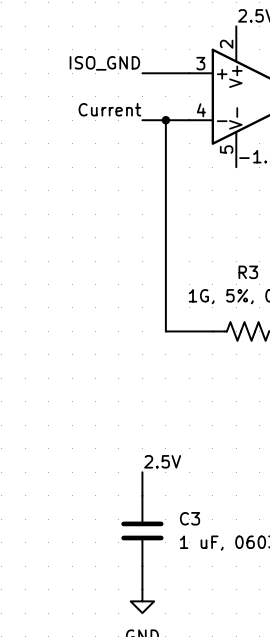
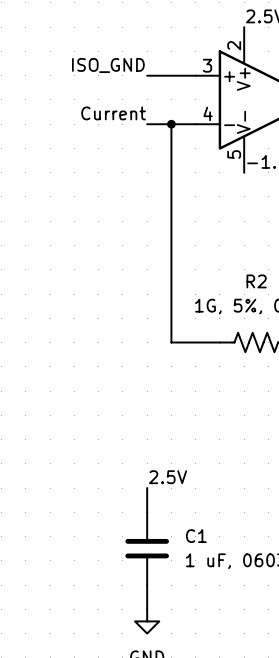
R3 name: R3 (248, 272) -> R2 (256, 281)
C3 name: C3 (190, 518) -> C1 (196, 536)

